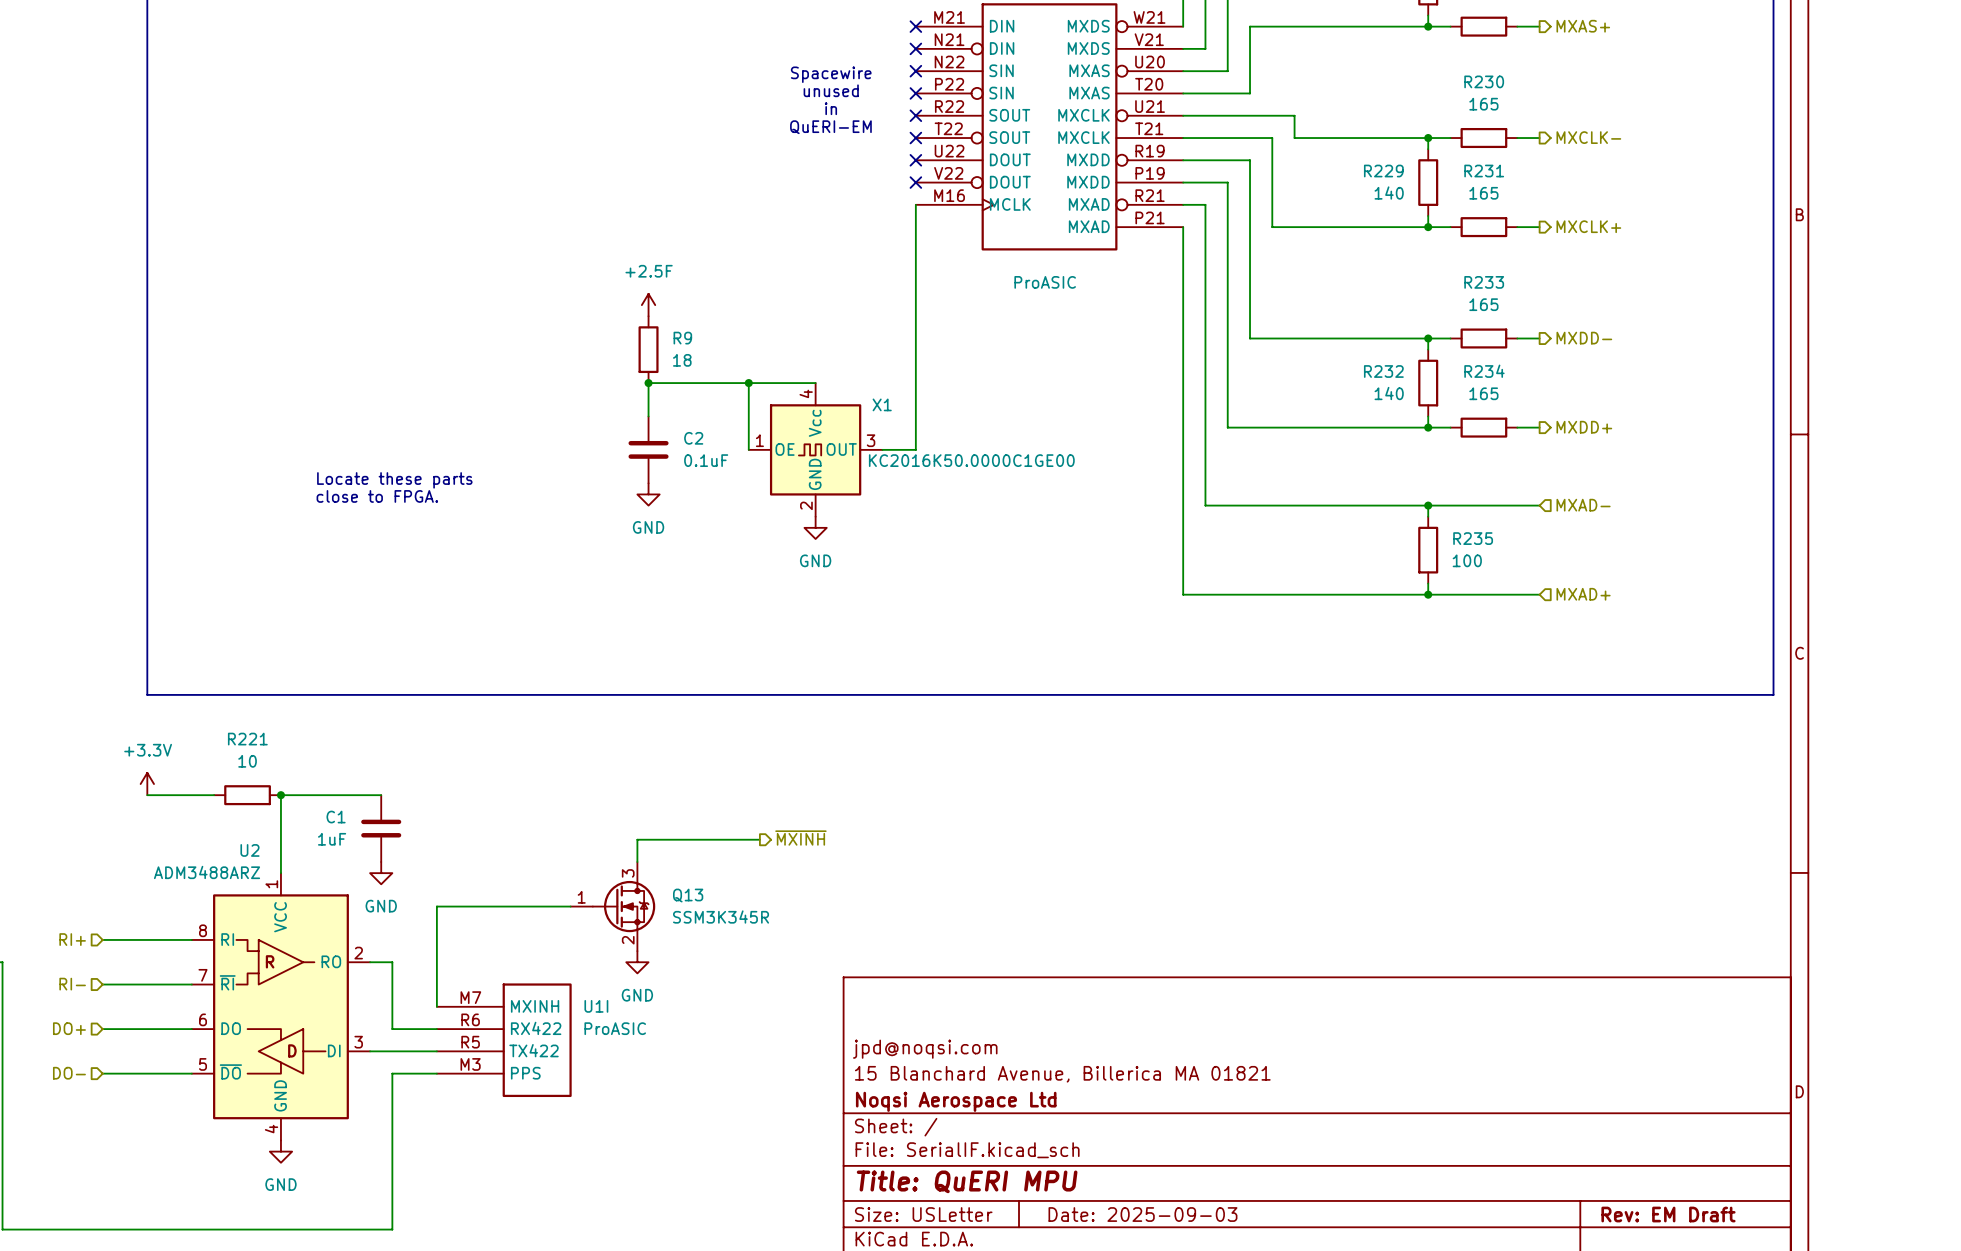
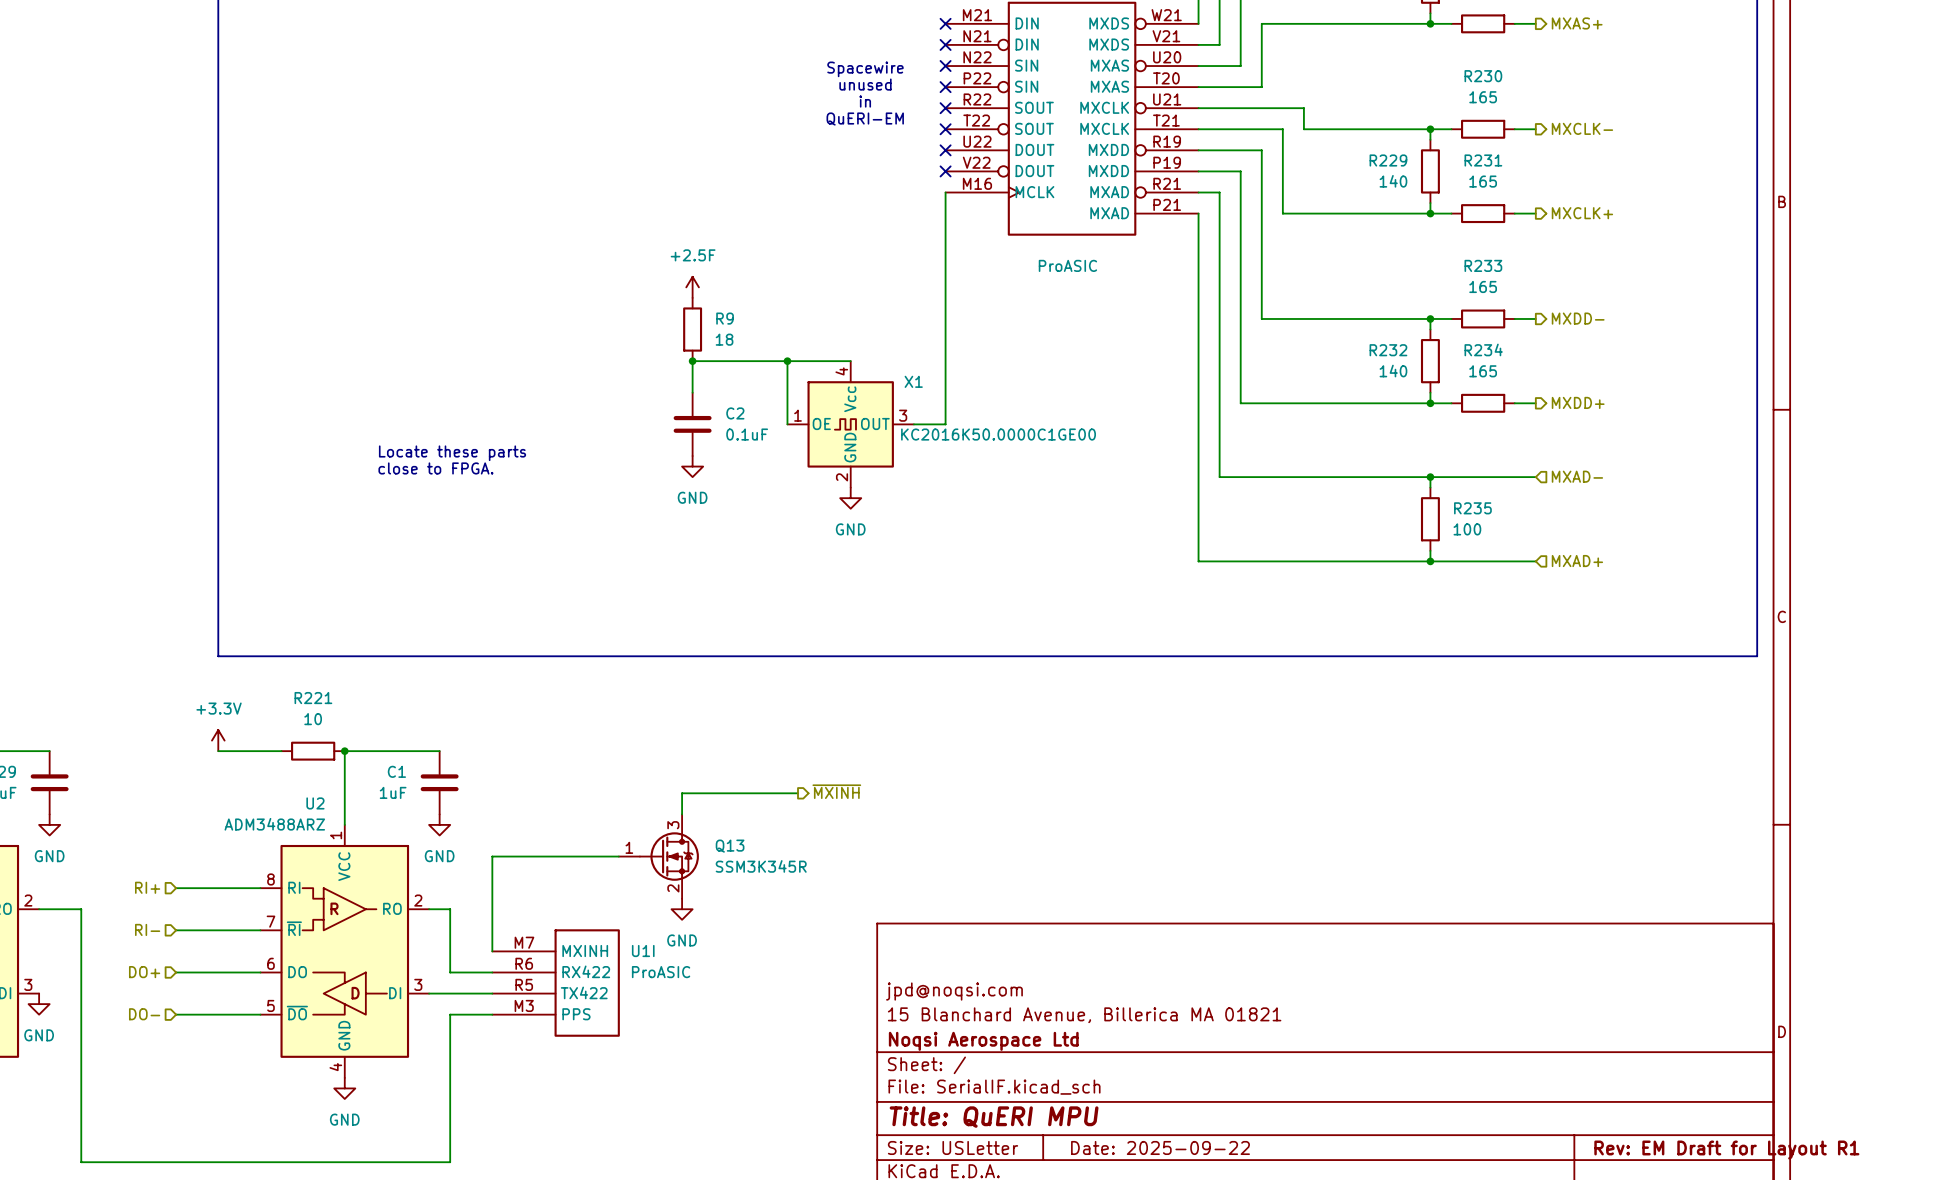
title block: Date: 2025-09-03 (1142, 1214) -> Date: 2025-09-22 (1160, 1147)
title block: Rev: EM Draft (1668, 1214) -> Rev: EM Draft for Layout R1 (1726, 1150)

